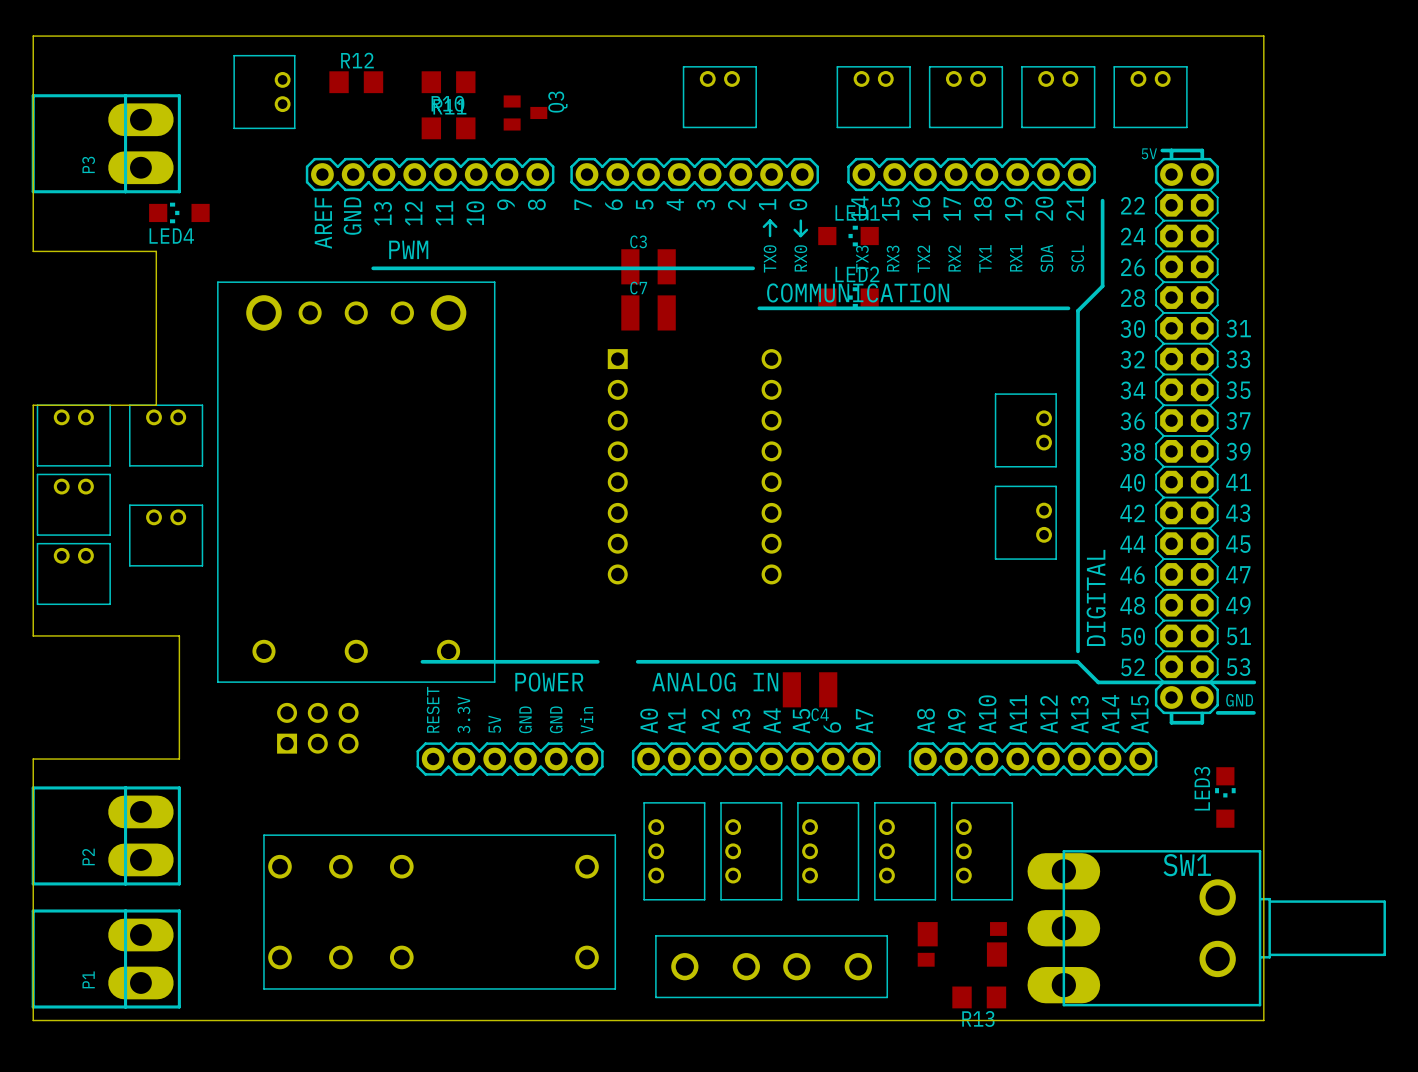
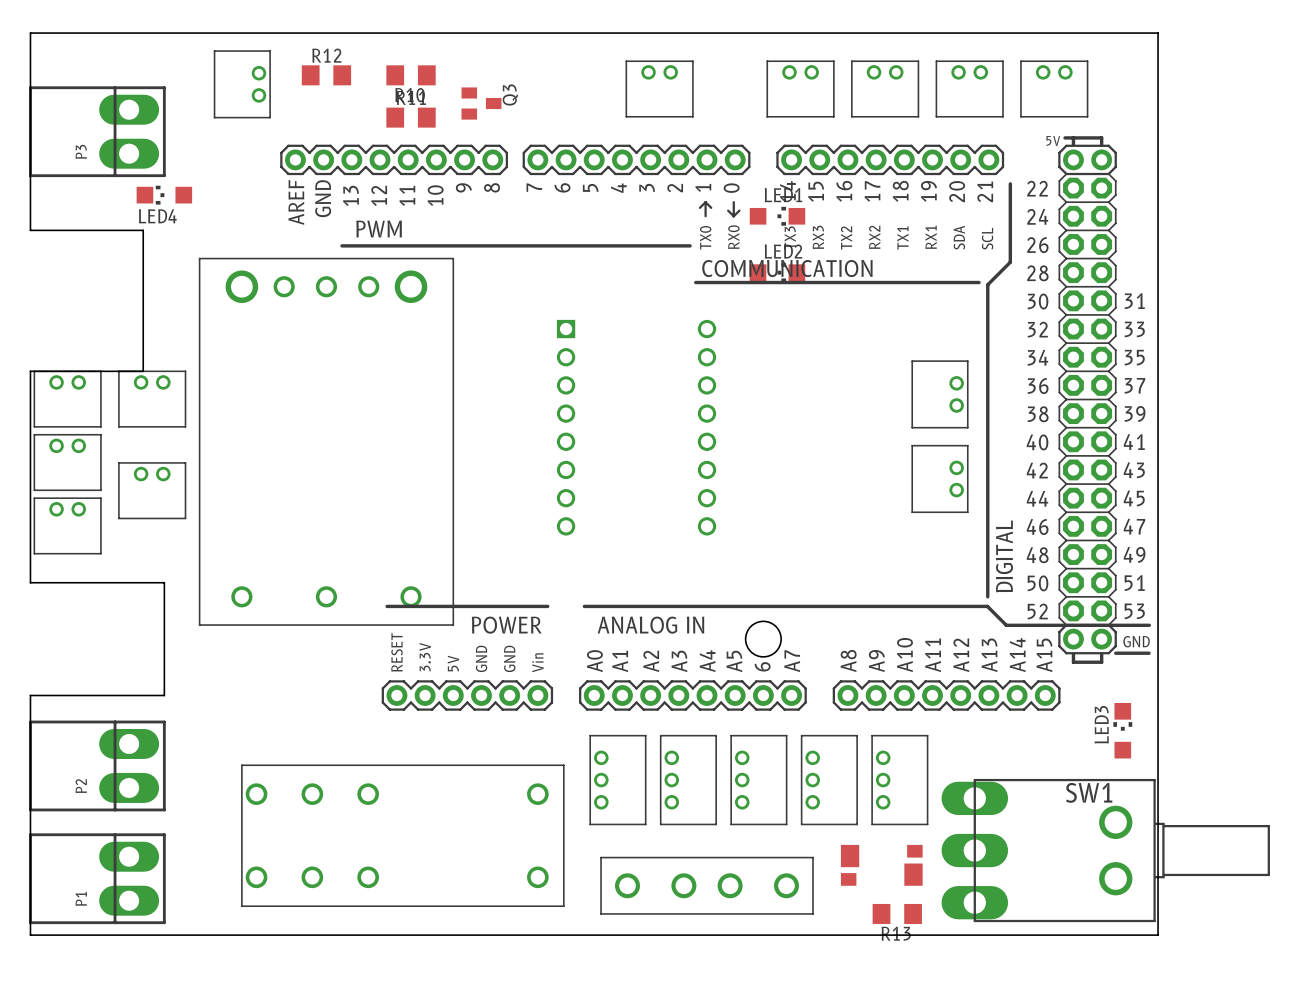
part footprint: [305, 148, 1257, 776] -> [280, 136, 1151, 711]
C3: (648, 266) -> none
C7: (648, 312) -> none
C4: (810, 689) -> none
part: (317, 728) -> none

